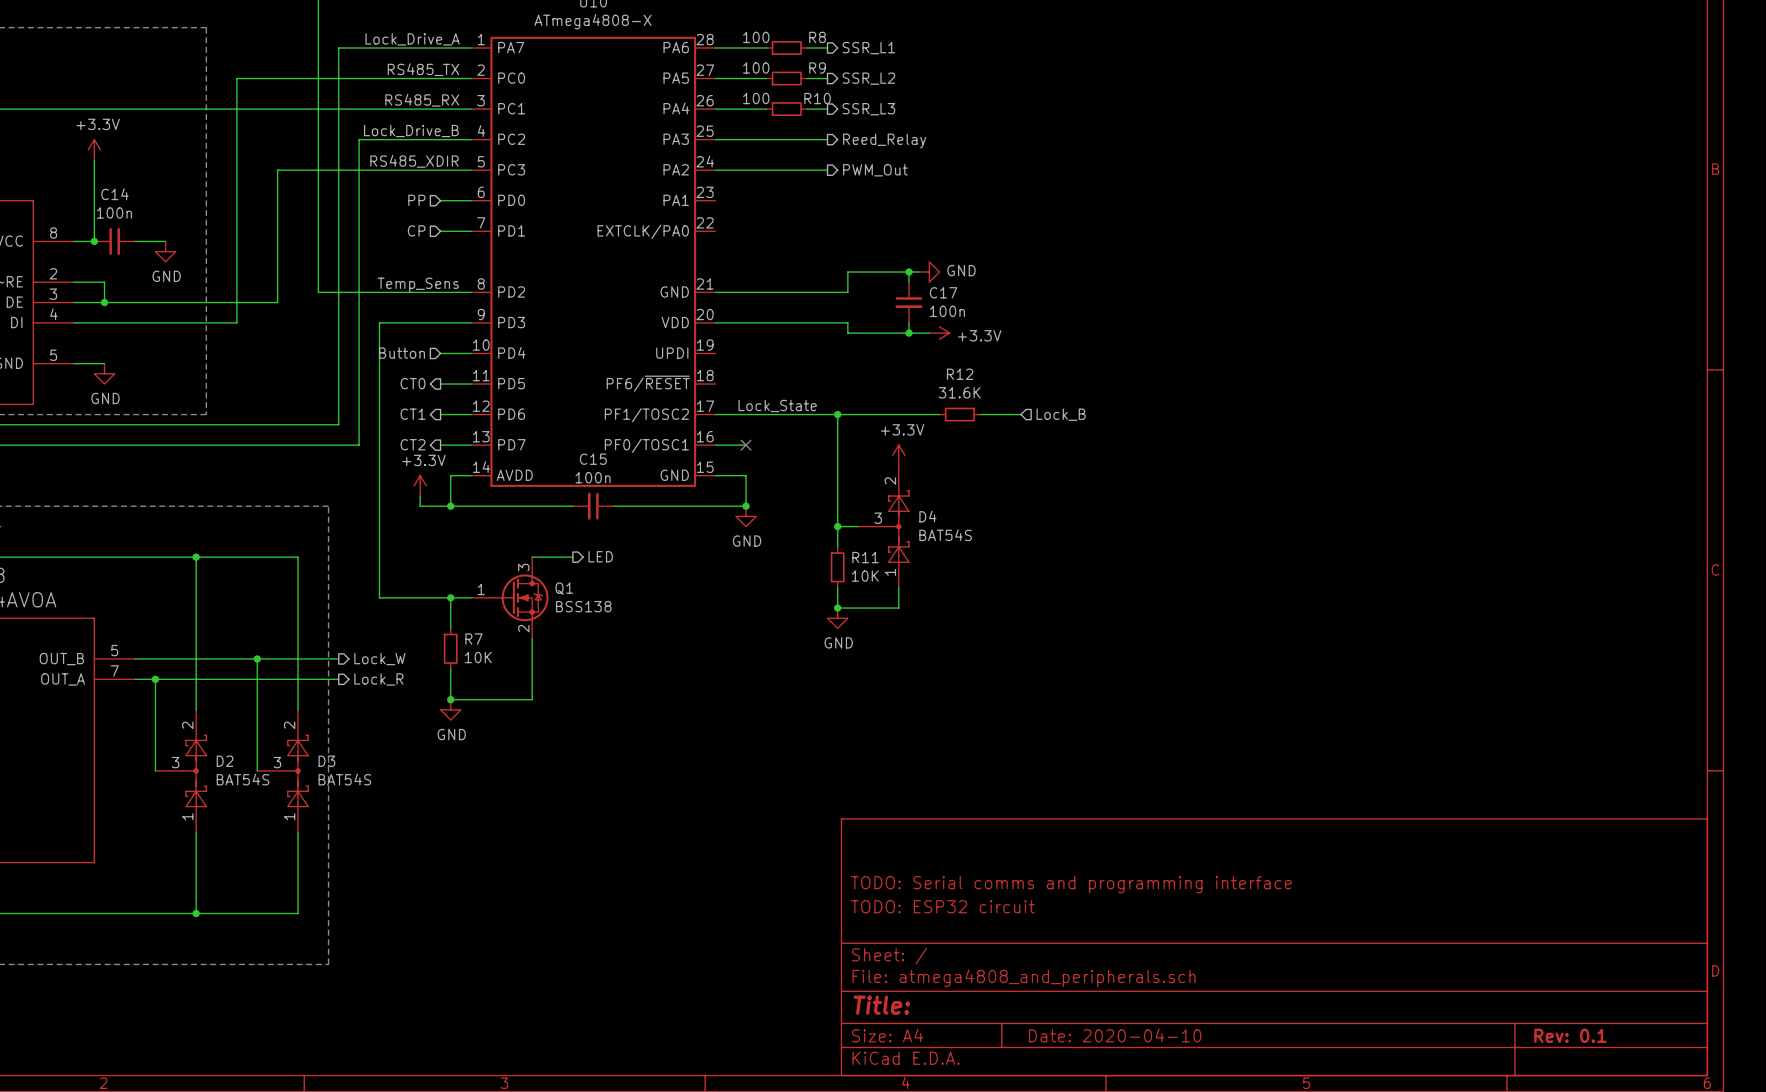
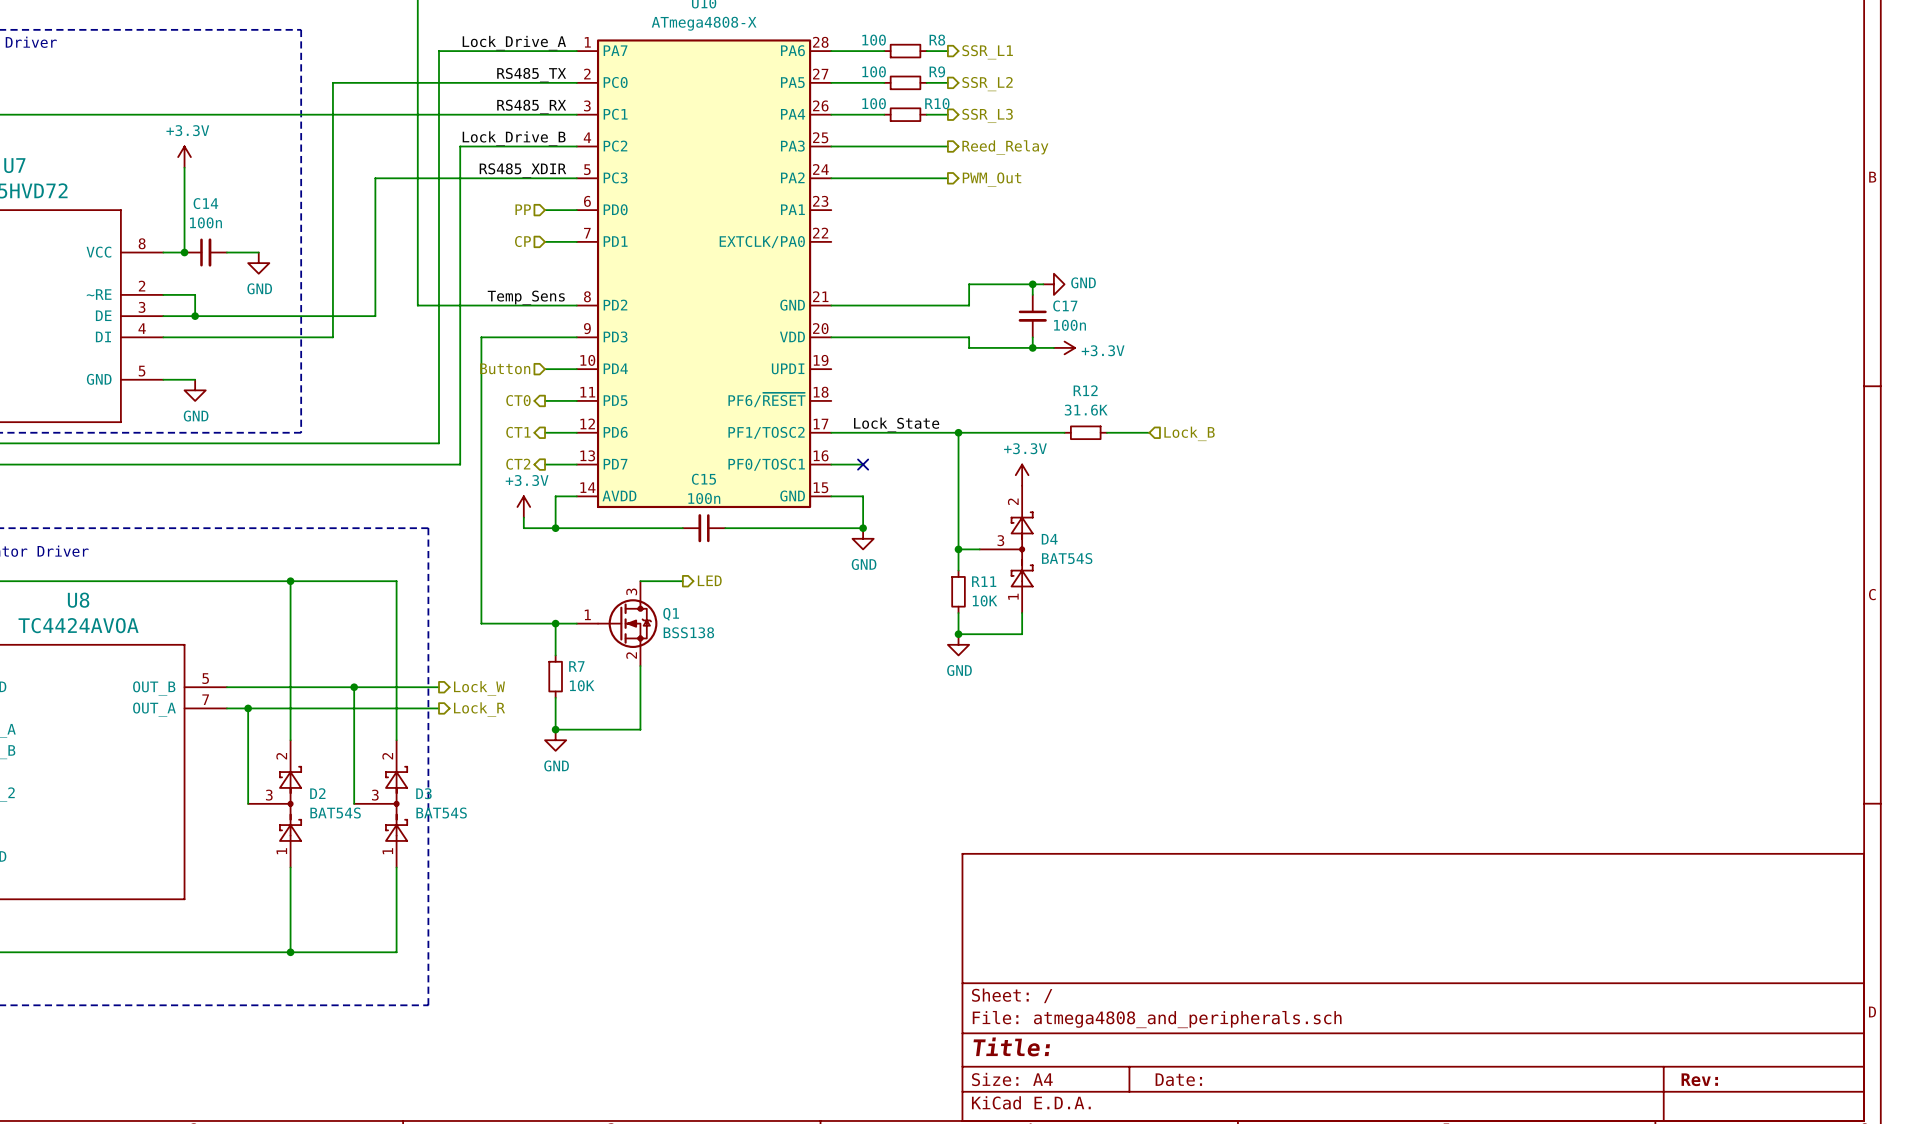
title block: TODO: Serial comms and programming interface (1071, 884) -> none
title block: TODO: ESP32 circuit (942, 906) -> none
title block: Date: 2020-04-10 (1115, 1035) -> Date: (1178, 1079)
title block: Rev: 0.1 (1570, 1035) -> Rev: (1699, 1079)

